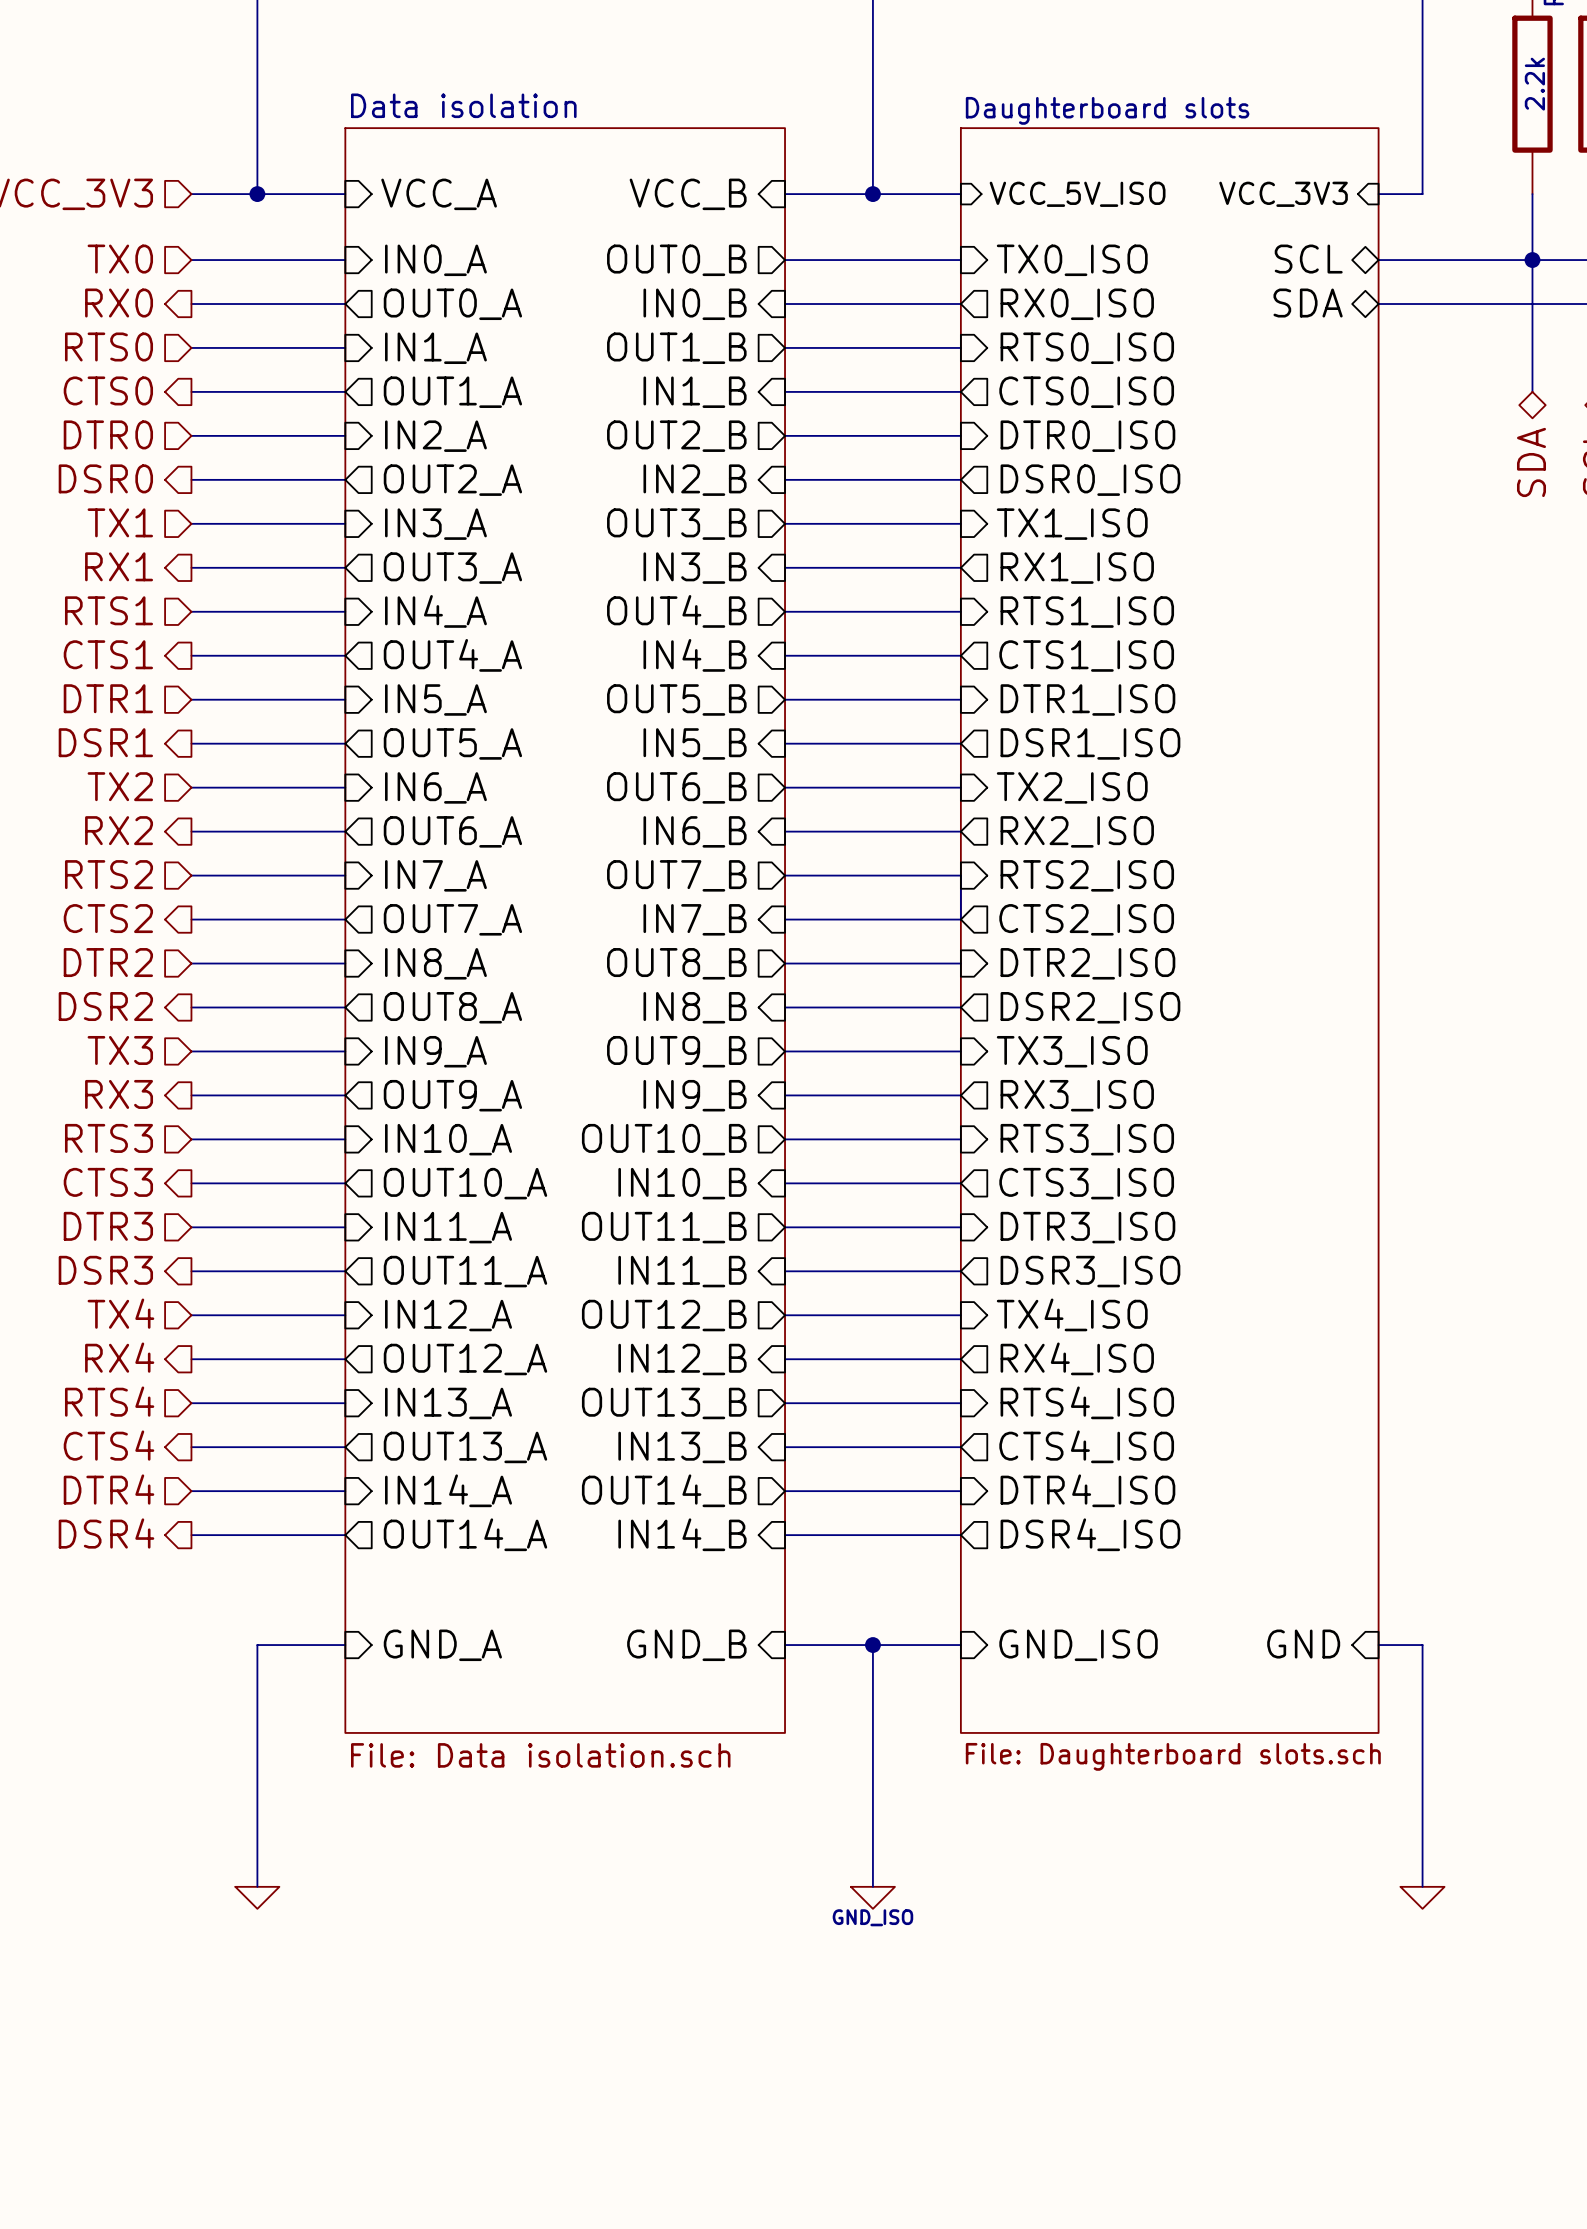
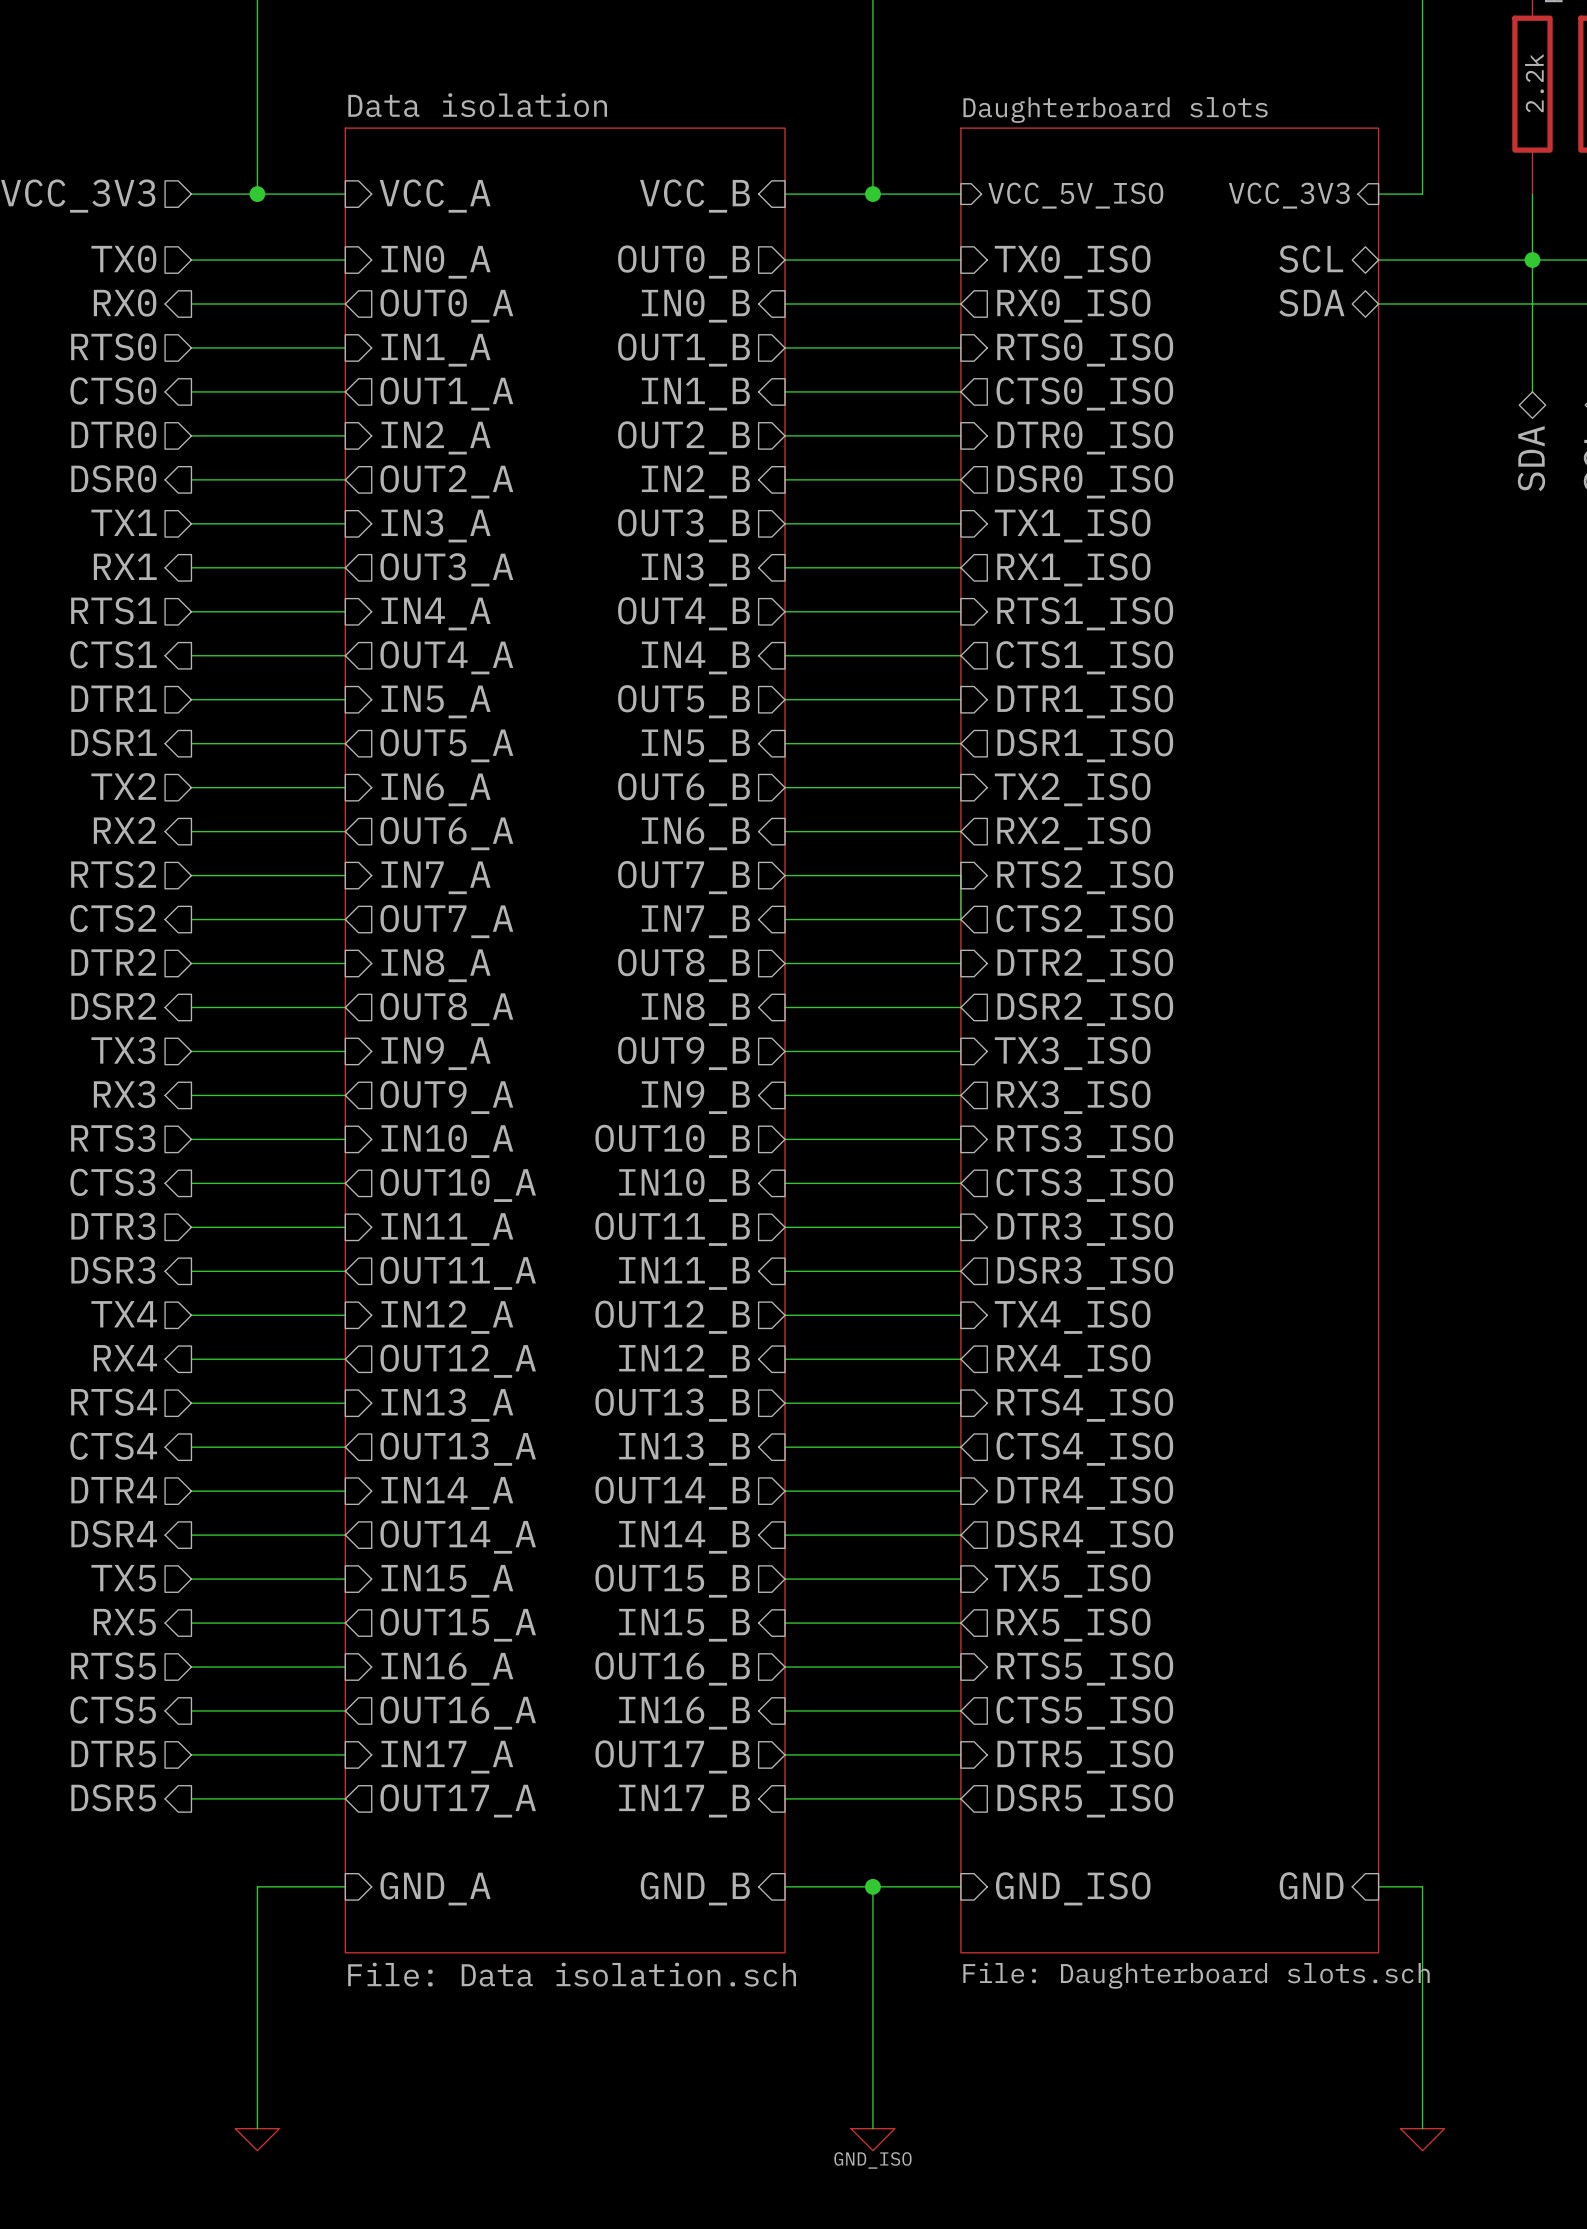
sheet Data isolation: File: Data isolation.sch (565, 930) -> none
sheet Daughterboard slots: File: Daughterboard slots.sch (1169, 930) -> none
sheet Data isolation: none -> File: Data isolation.sch (565, 1040)
sheet Daughterboard slots: none -> File: Daughterboard slots.sch (1169, 1040)
hierarchical label: none -> TX5 (123, 1578)
wire: none -> (191, 1579) (345, 1579)
sheet pin: none -> IN15_A (447, 1581)
sheet pin: none -> OUT15_B (672, 1581)
wire: none -> (785, 1579) (960, 1579)
sheet pin: none -> TX5_ISO (1072, 1581)
hierarchical label: none -> RX5 (124, 1622)
wire: none -> (191, 1623) (345, 1623)
sheet pin: none -> OUT15_A (458, 1625)
sheet pin: none -> IN15_B (684, 1625)
wire: none -> (785, 1623) (960, 1623)
sheet pin: none -> RX5_ISO (1073, 1625)
sheet pin position: GND (1303, 1644) -> GND (1311, 1885)
wire: (345, 1645) (257, 1645) (257, 1886) -> (345, 1886) (257, 1886) (257, 2128)
sheet pin position: GND_A (442, 1645) -> GND_A (435, 1888)
sheet pin position: GND_B (686, 1645) -> GND_B (695, 1888)
wire: (785, 1645) (960, 1645) -> (785, 1886) (960, 1886)
wire: (872, 1645) (872, 1886) -> (872, 2128) (872, 1886)
junction: (872, 1645) -> none
sheet pin position: GND_ISO (1078, 1645) -> GND_ISO (1073, 1888)
wire: (1378, 1645) (1422, 1645) (1422, 1886) -> (1378, 1886) (1422, 1886) (1422, 2128)
hierarchical label: none -> RTS5 (113, 1666)
wire: none -> (191, 1667) (345, 1667)
sheet pin: none -> IN16_A (447, 1669)
sheet pin: none -> OUT16_B (672, 1668)
wire: none -> (785, 1667) (960, 1667)
sheet pin: none -> RTS5_ISO (1085, 1668)
hierarchical label: none -> CTS5 (113, 1710)
wire: none -> (191, 1710) (345, 1710)
wire: none -> (785, 1710) (960, 1710)
sheet pin: none -> OUT16_A (458, 1712)
sheet pin: none -> IN16_B (684, 1713)
sheet pin: none -> CTS5_ISO (1084, 1712)
hierarchical label: none -> DTR5 (113, 1754)
wire: none -> (191, 1754) (345, 1754)
wire: none -> (785, 1754) (960, 1754)
sheet pin: none -> IN17_A (447, 1757)
sheet pin: none -> OUT17_B (672, 1756)
sheet pin: none -> DTR5_ISO (1085, 1756)
hierarchical label: none -> DSR5 (113, 1797)
wire: none -> (191, 1798) (345, 1798)
wire: none -> (785, 1798) (960, 1798)
sheet pin: none -> OUT17_A (458, 1800)
sheet pin: none -> IN17_B (684, 1801)
sheet pin: none -> DSR5_ISO (1085, 1800)
junction: none -> (872, 1886)
power symbol position: (257, 1897) -> (257, 2139)
power symbol position: GND_ISO (872, 1897) -> GND_ISO (872, 2139)
power symbol position: (1422, 1897) -> (1422, 2139)

